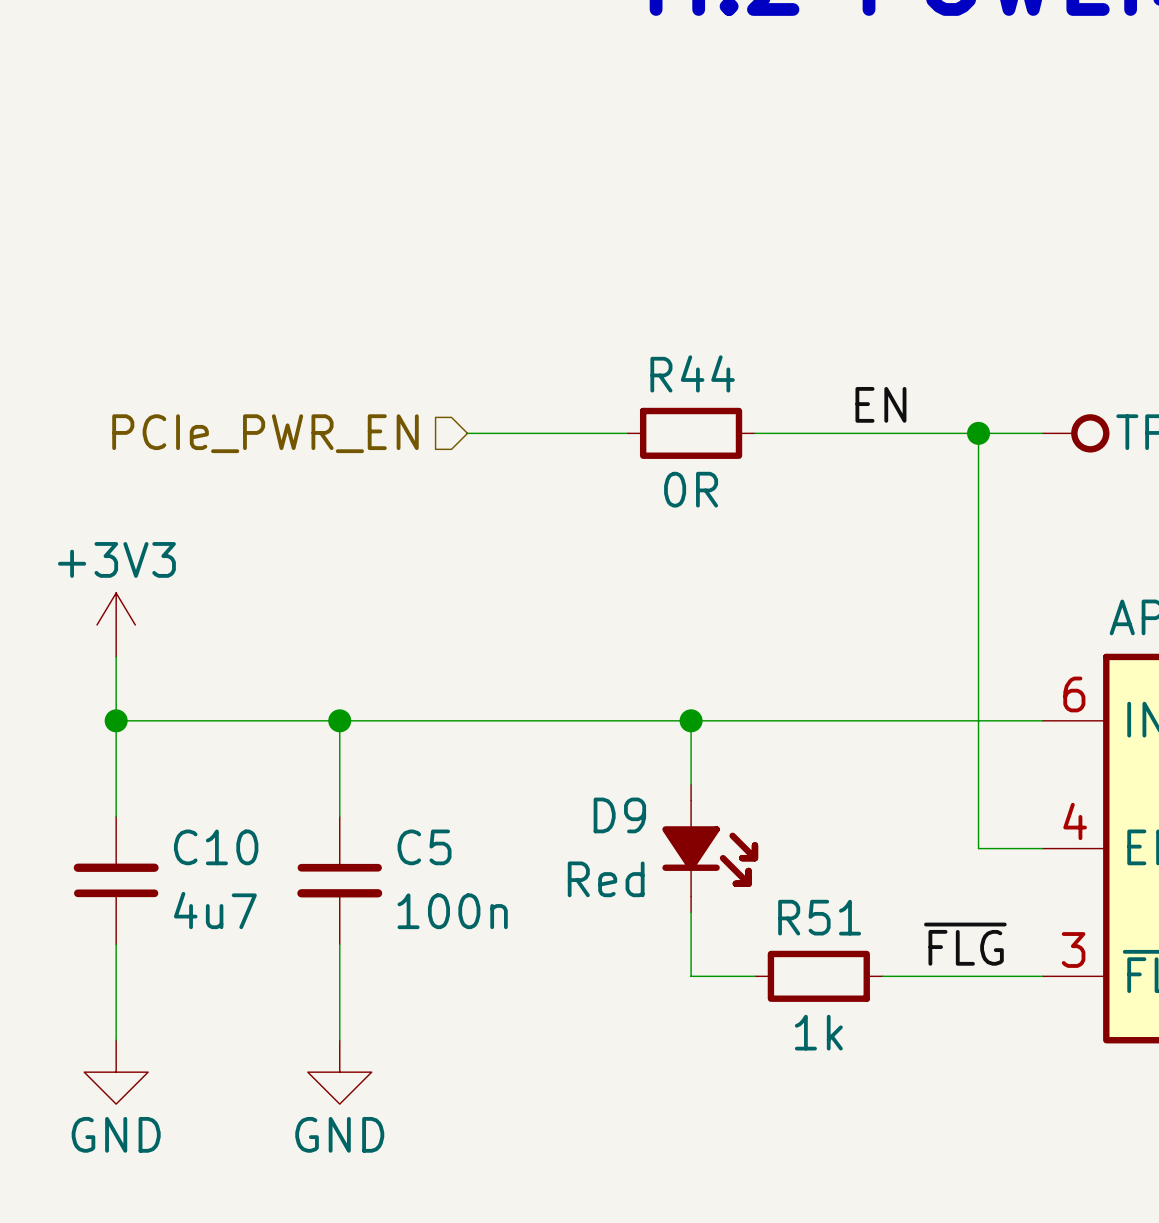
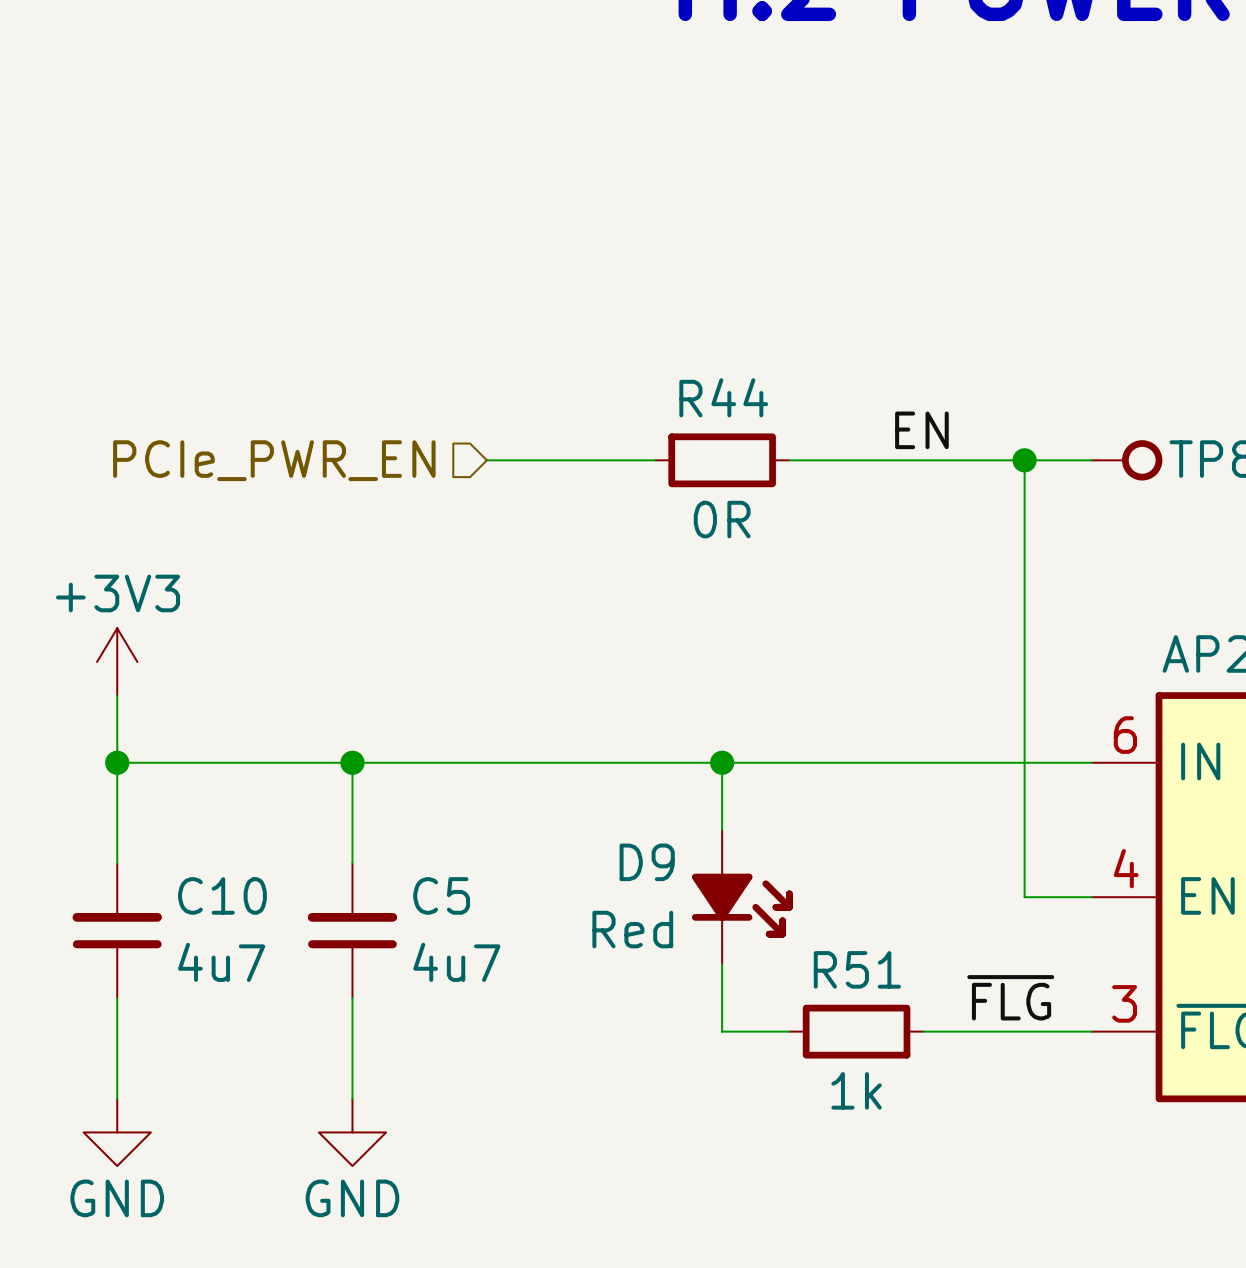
C5 rotation: 0° (339, 880) -> 180° (352, 930)
C5 text: 100n (452, 911) -> 4u7 (456, 962)

